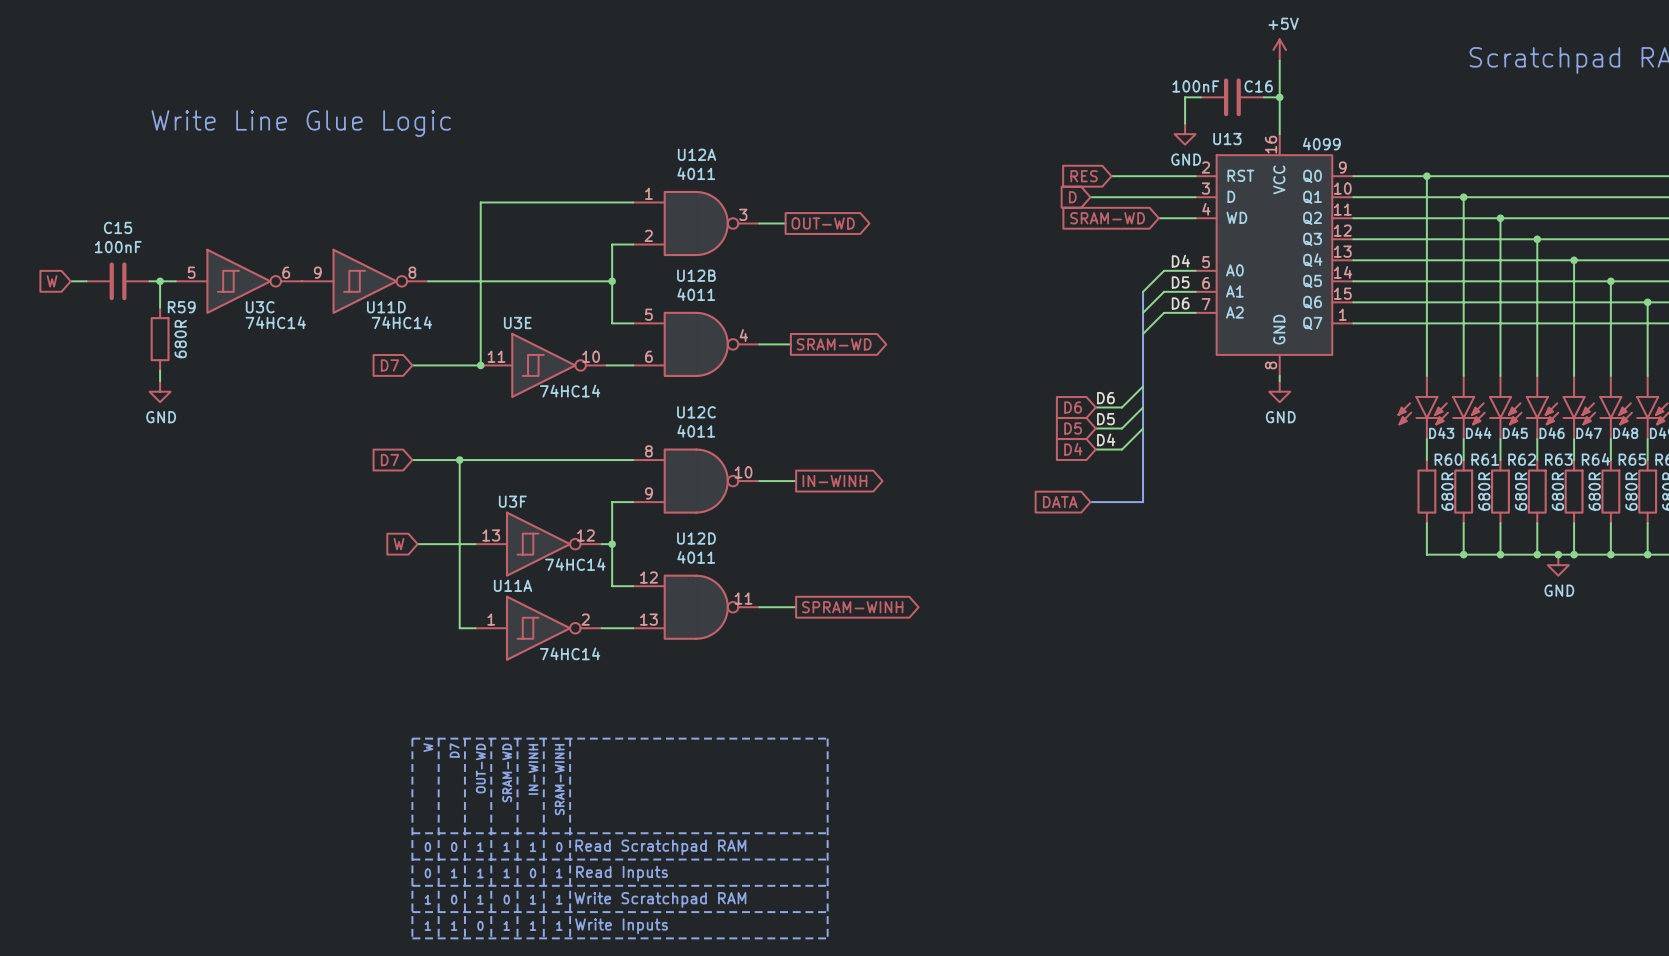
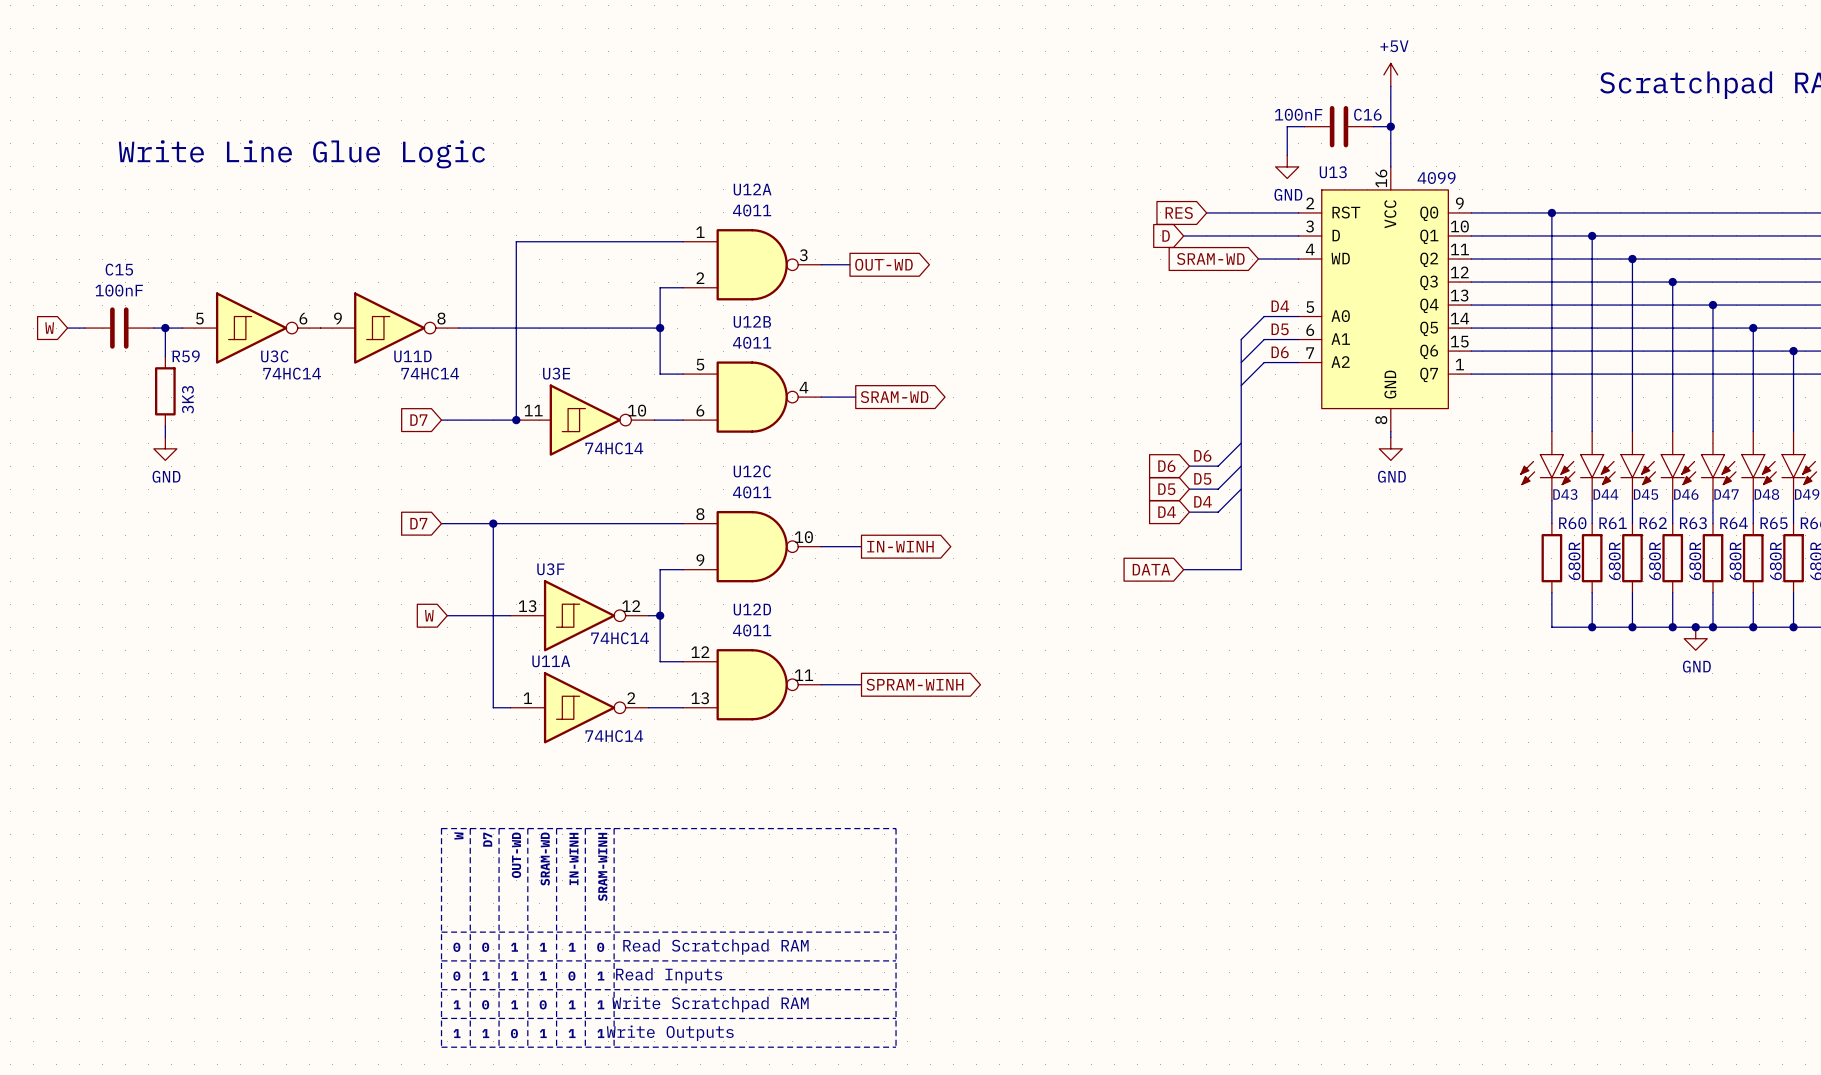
R59 value: 680R (180, 339) -> 3K3 (187, 399)
text: Write Inputs (621, 926) -> Write Outputs (670, 1033)

